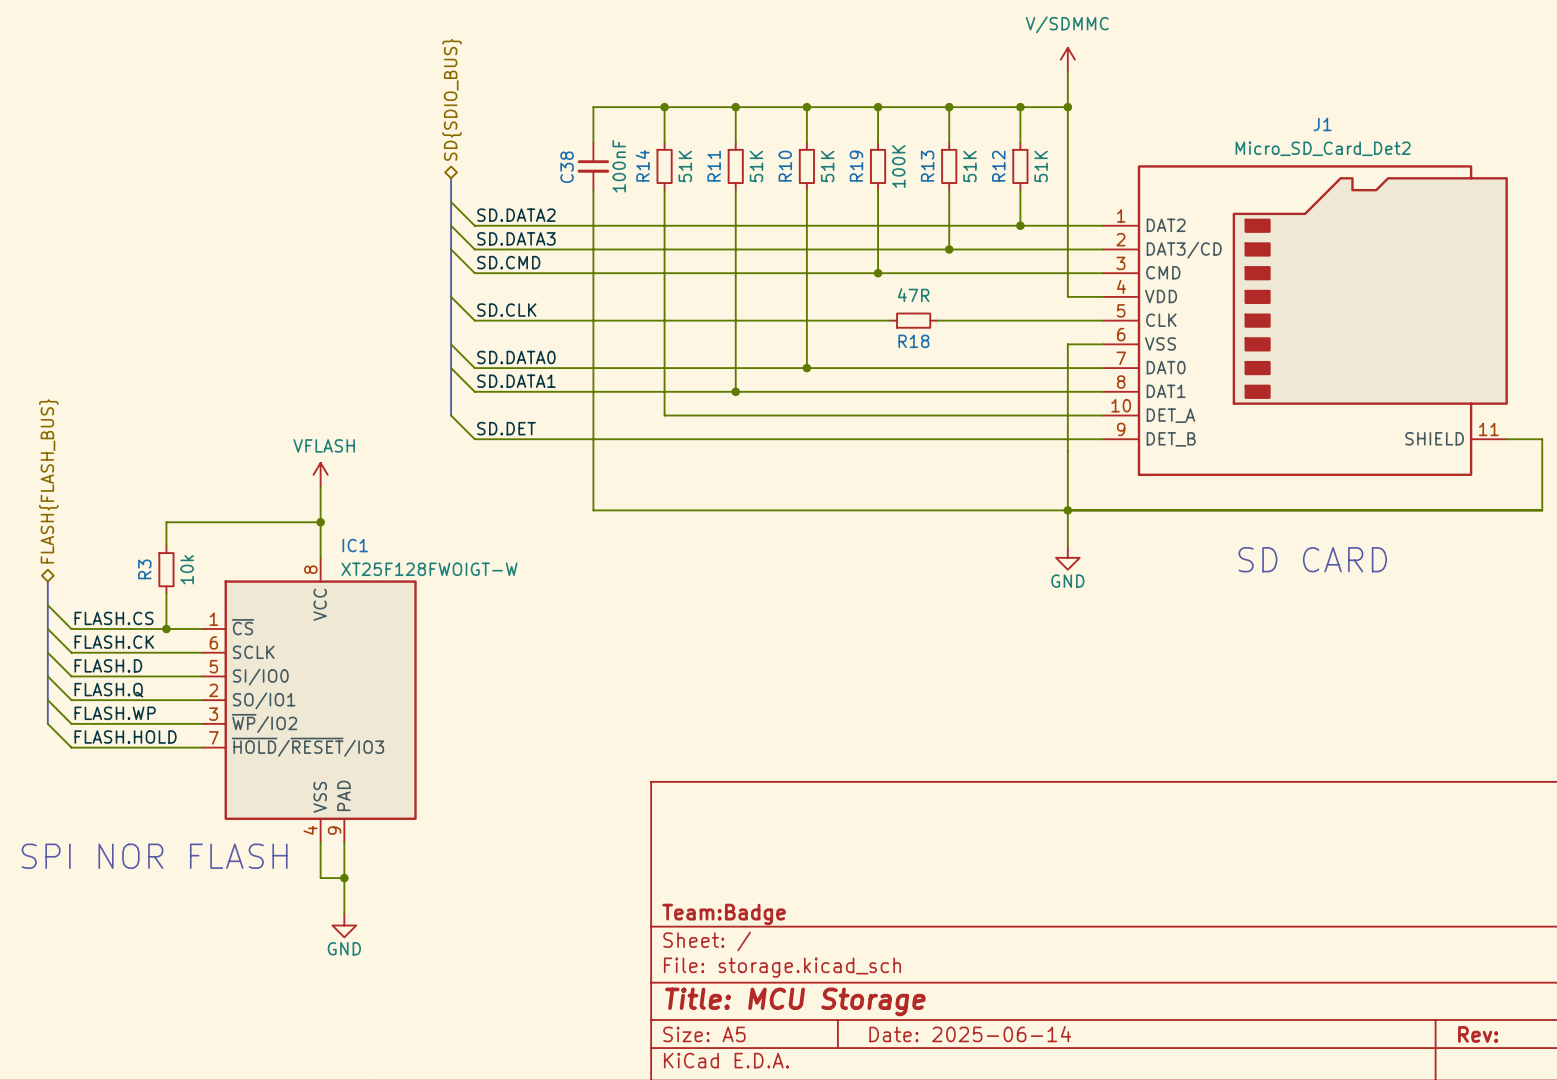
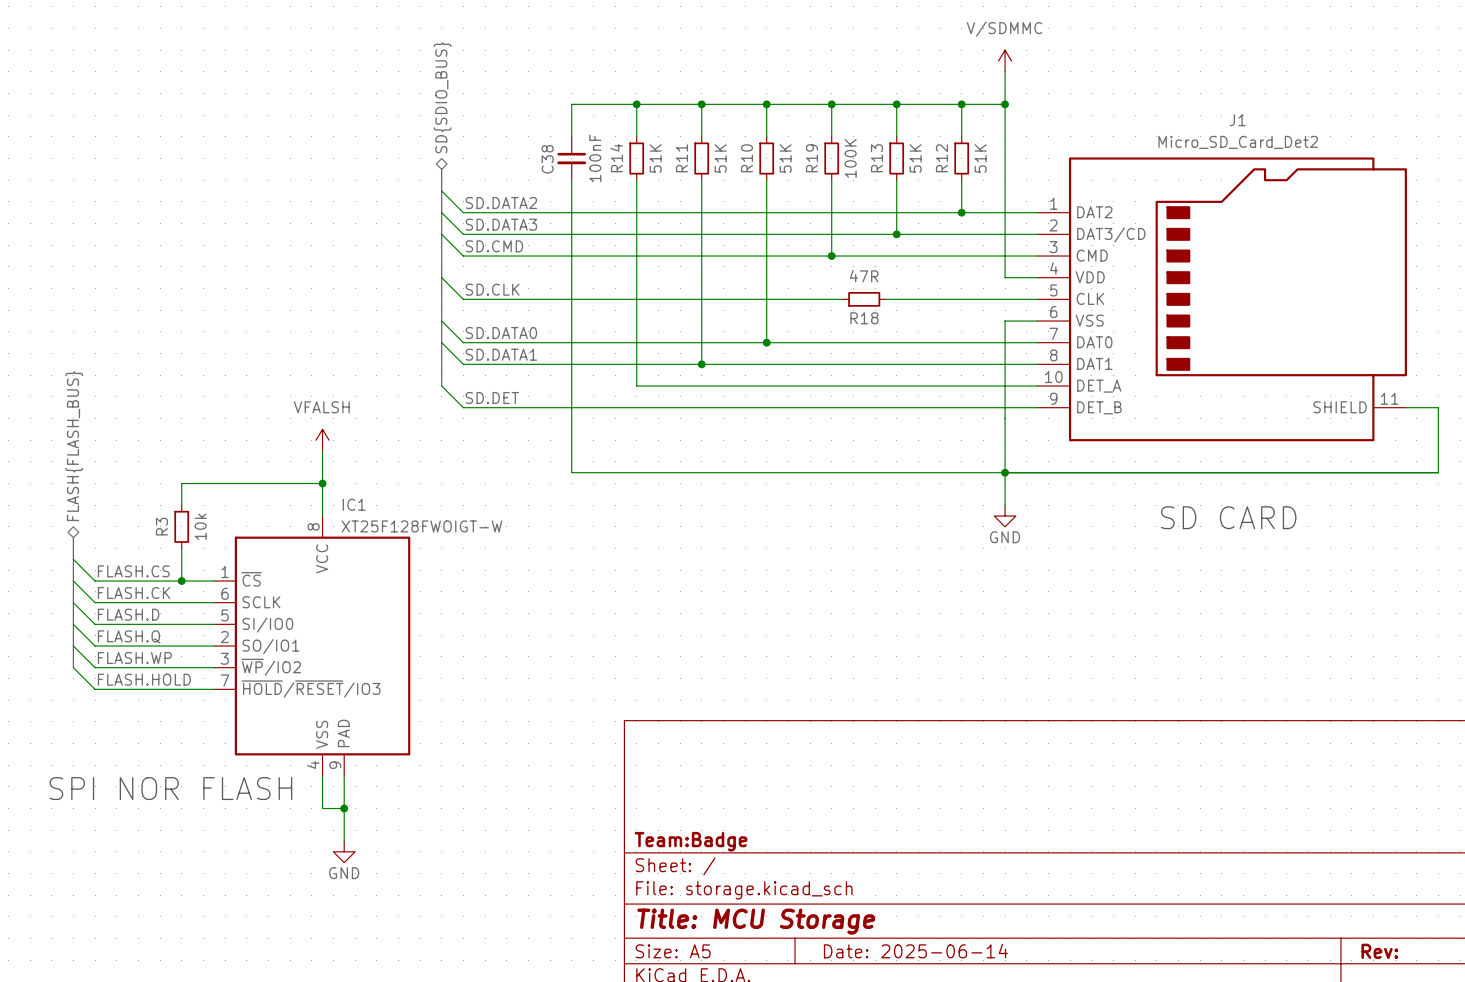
power symbol: VFLASH (320, 474) -> VFALSH (322, 440)

